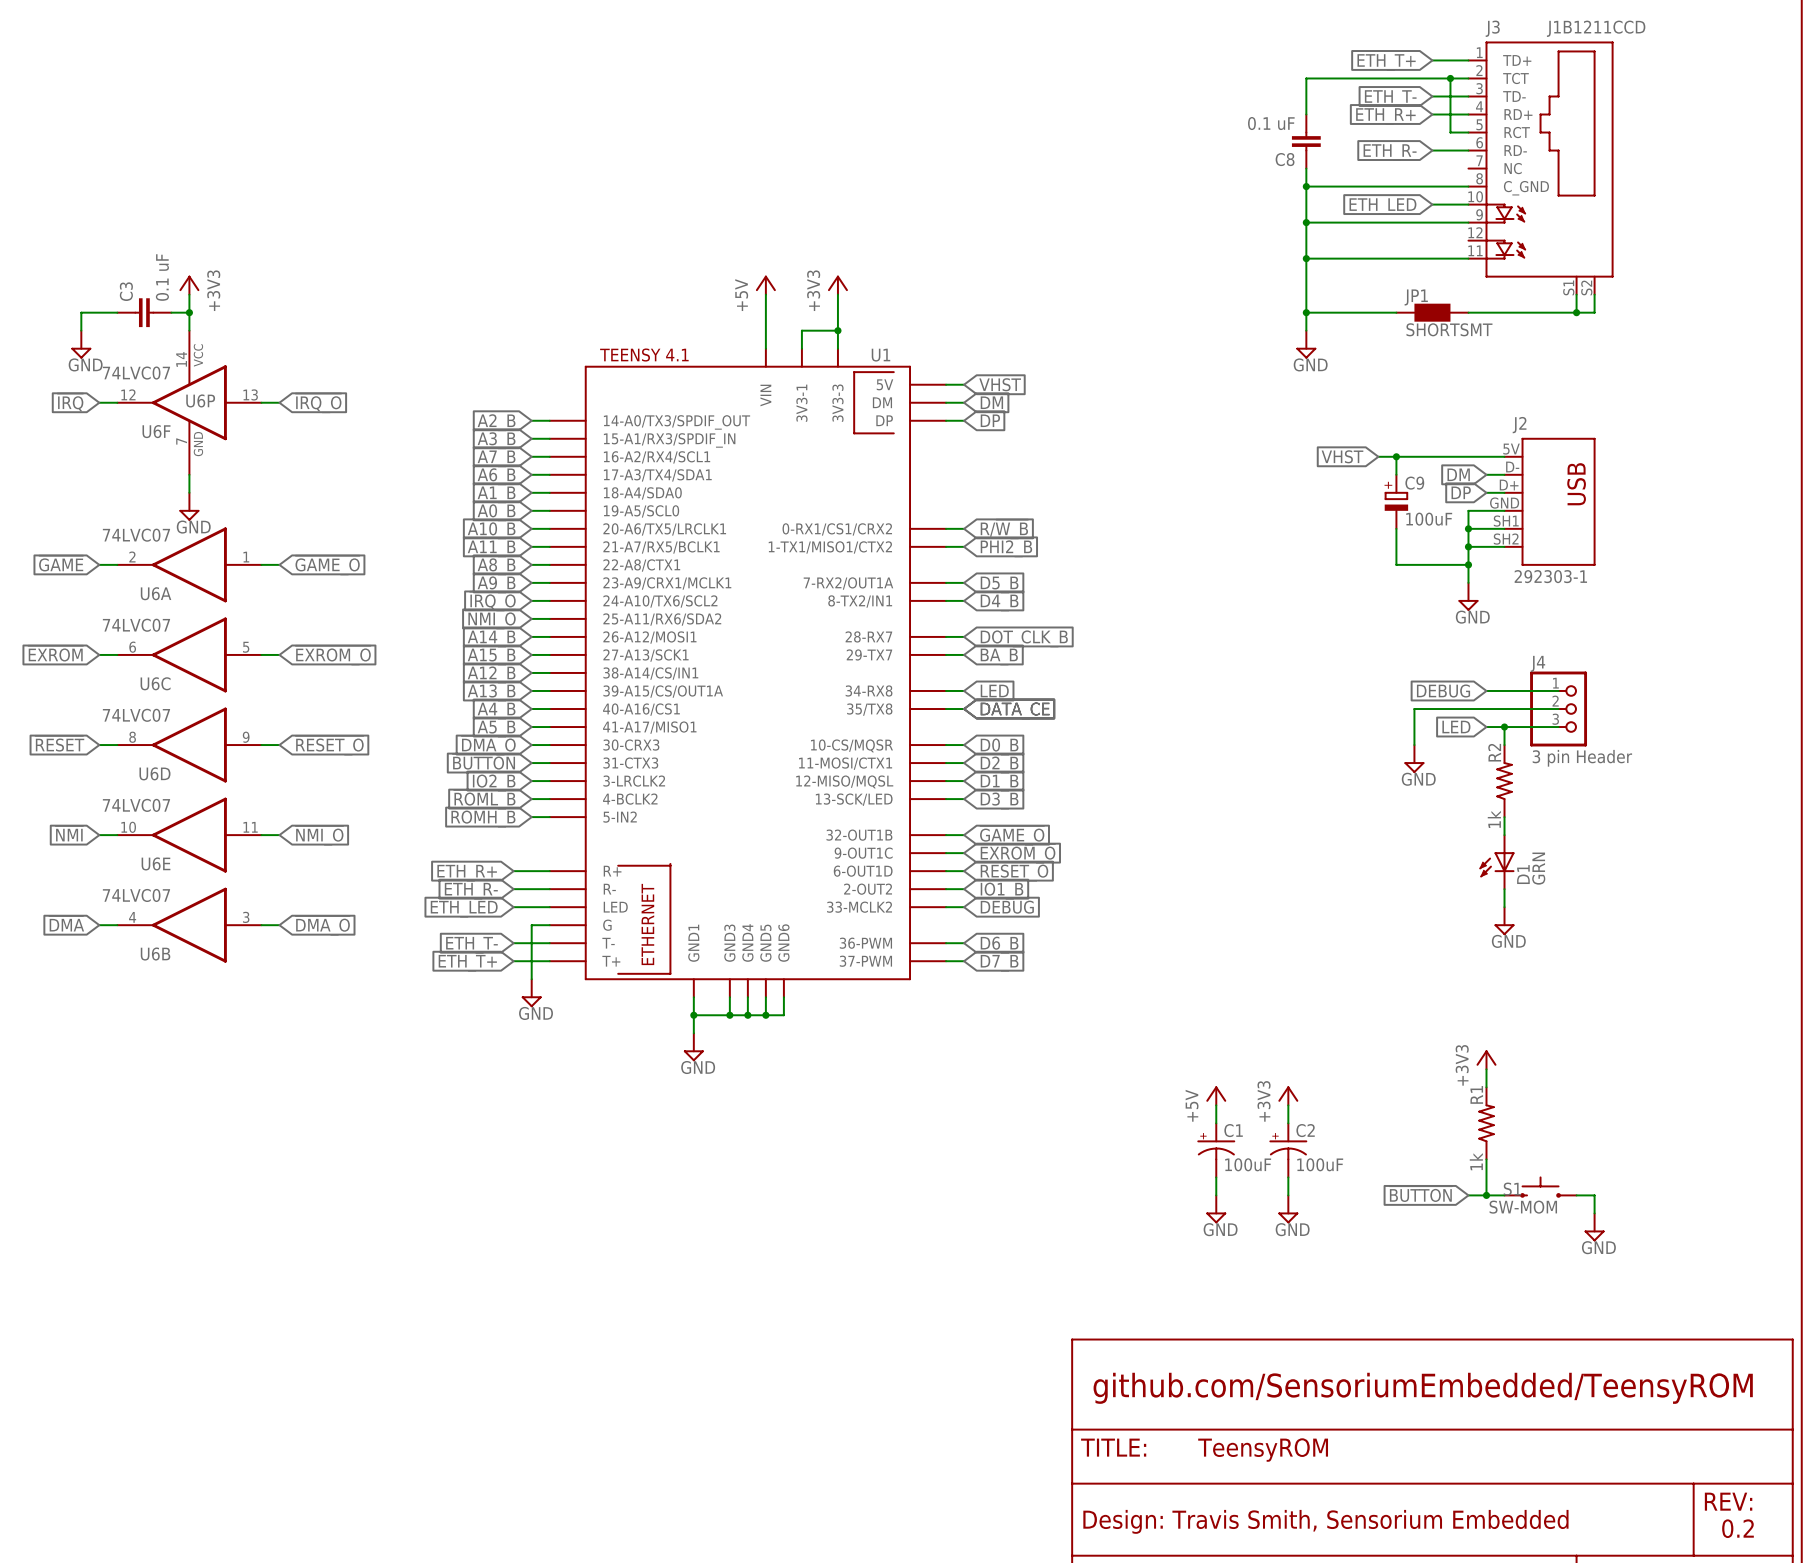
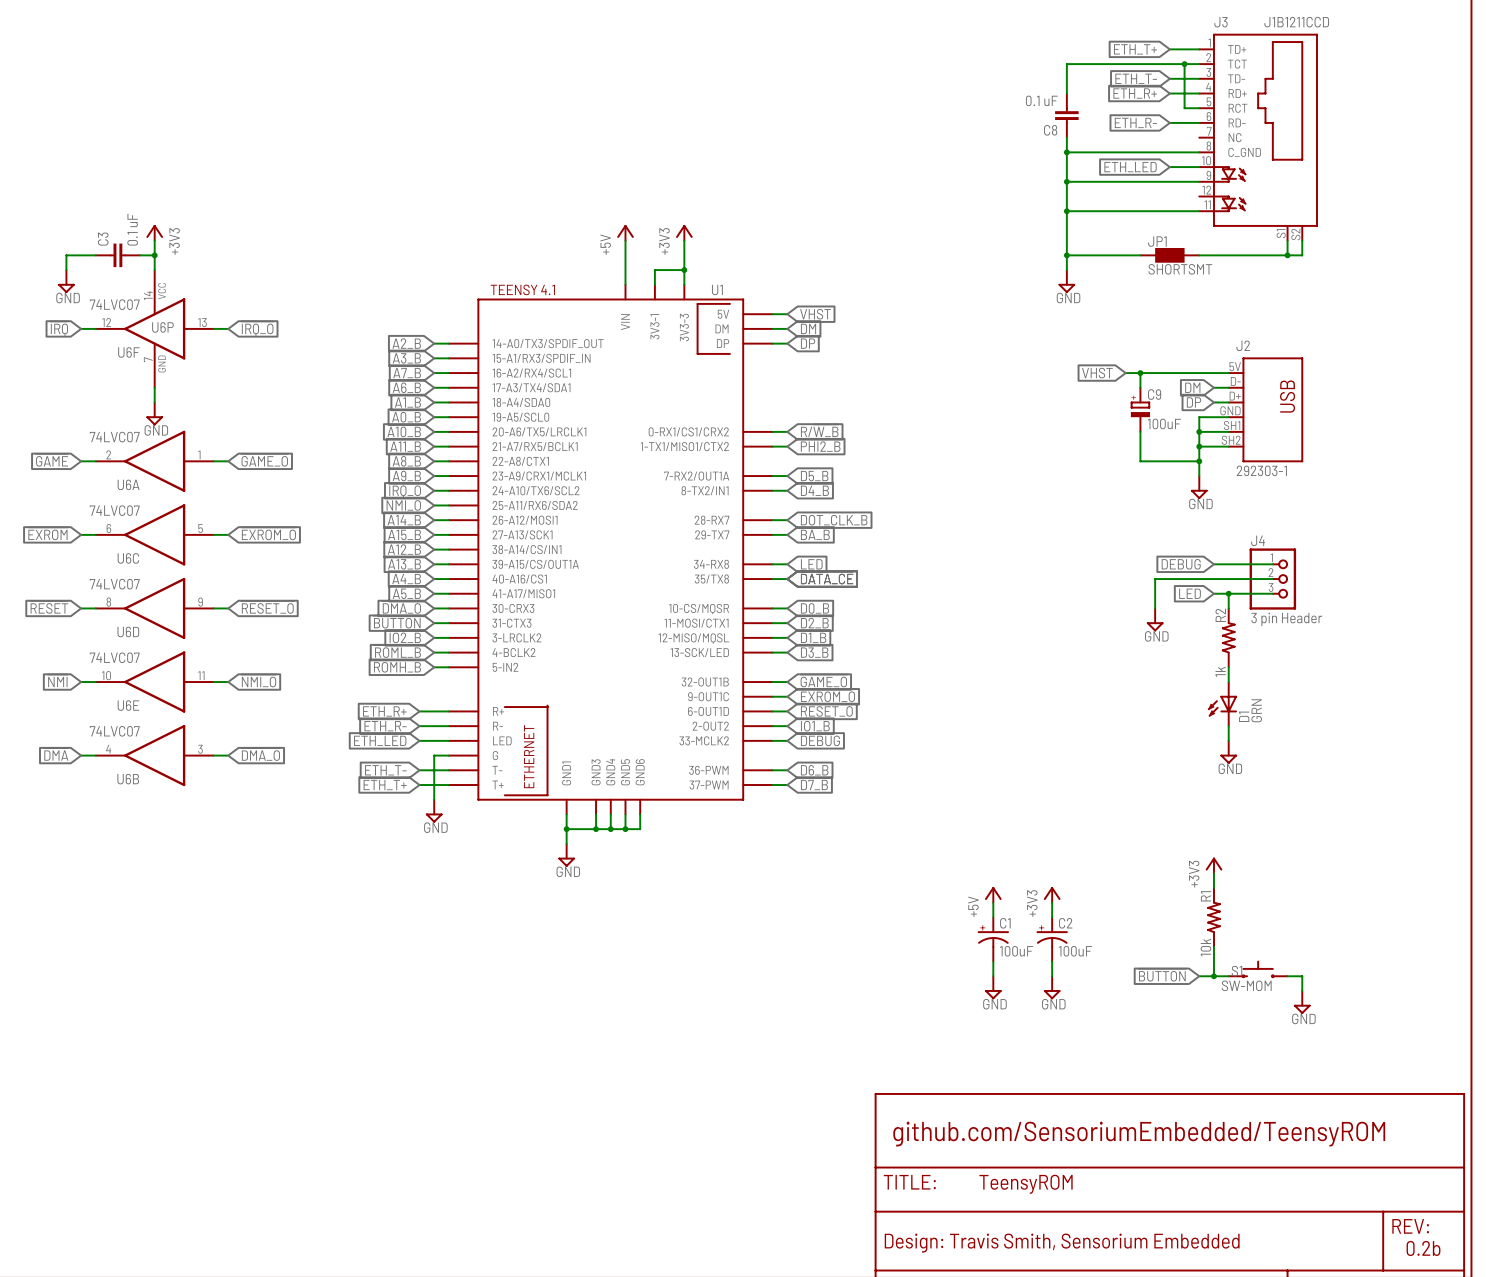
R1 value: 1k (1476, 1161) -> 10k (1205, 947)
text: 0.2 (1737, 1528) -> 0.2b (1423, 1248)

